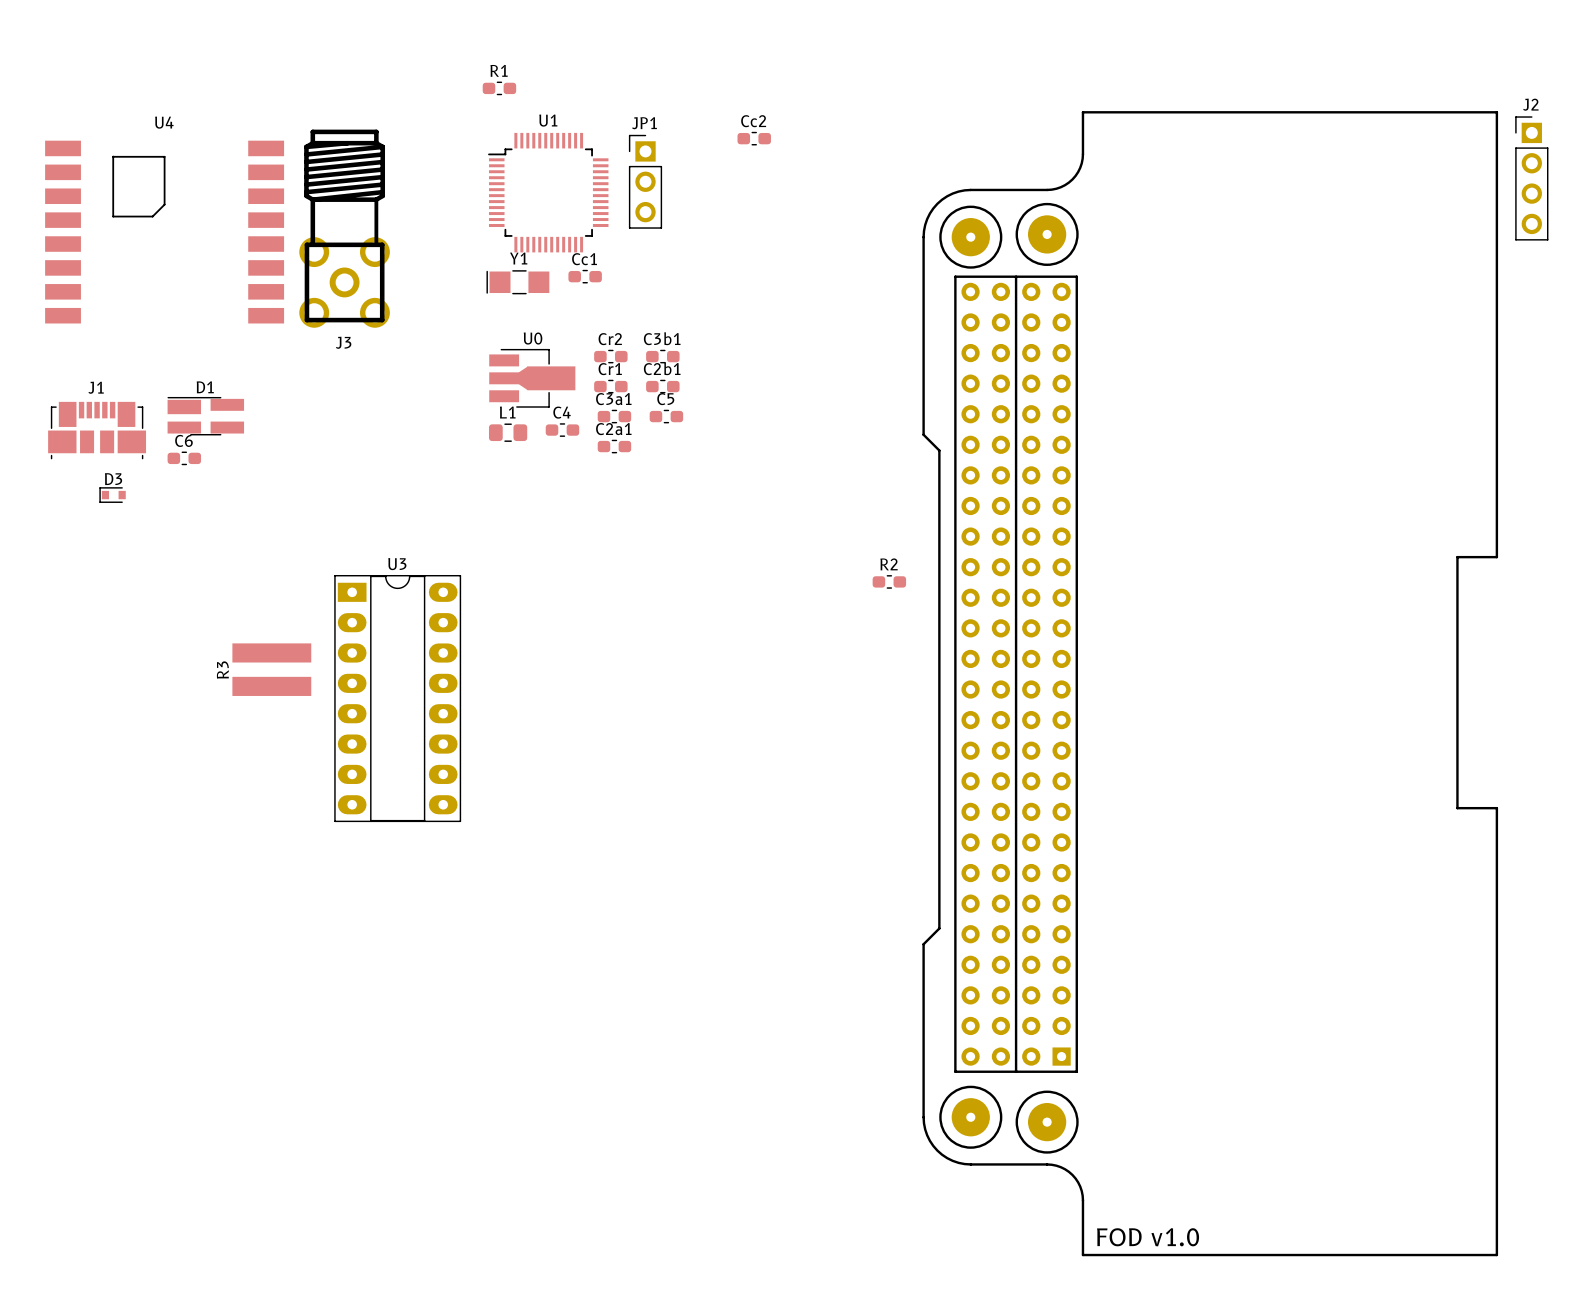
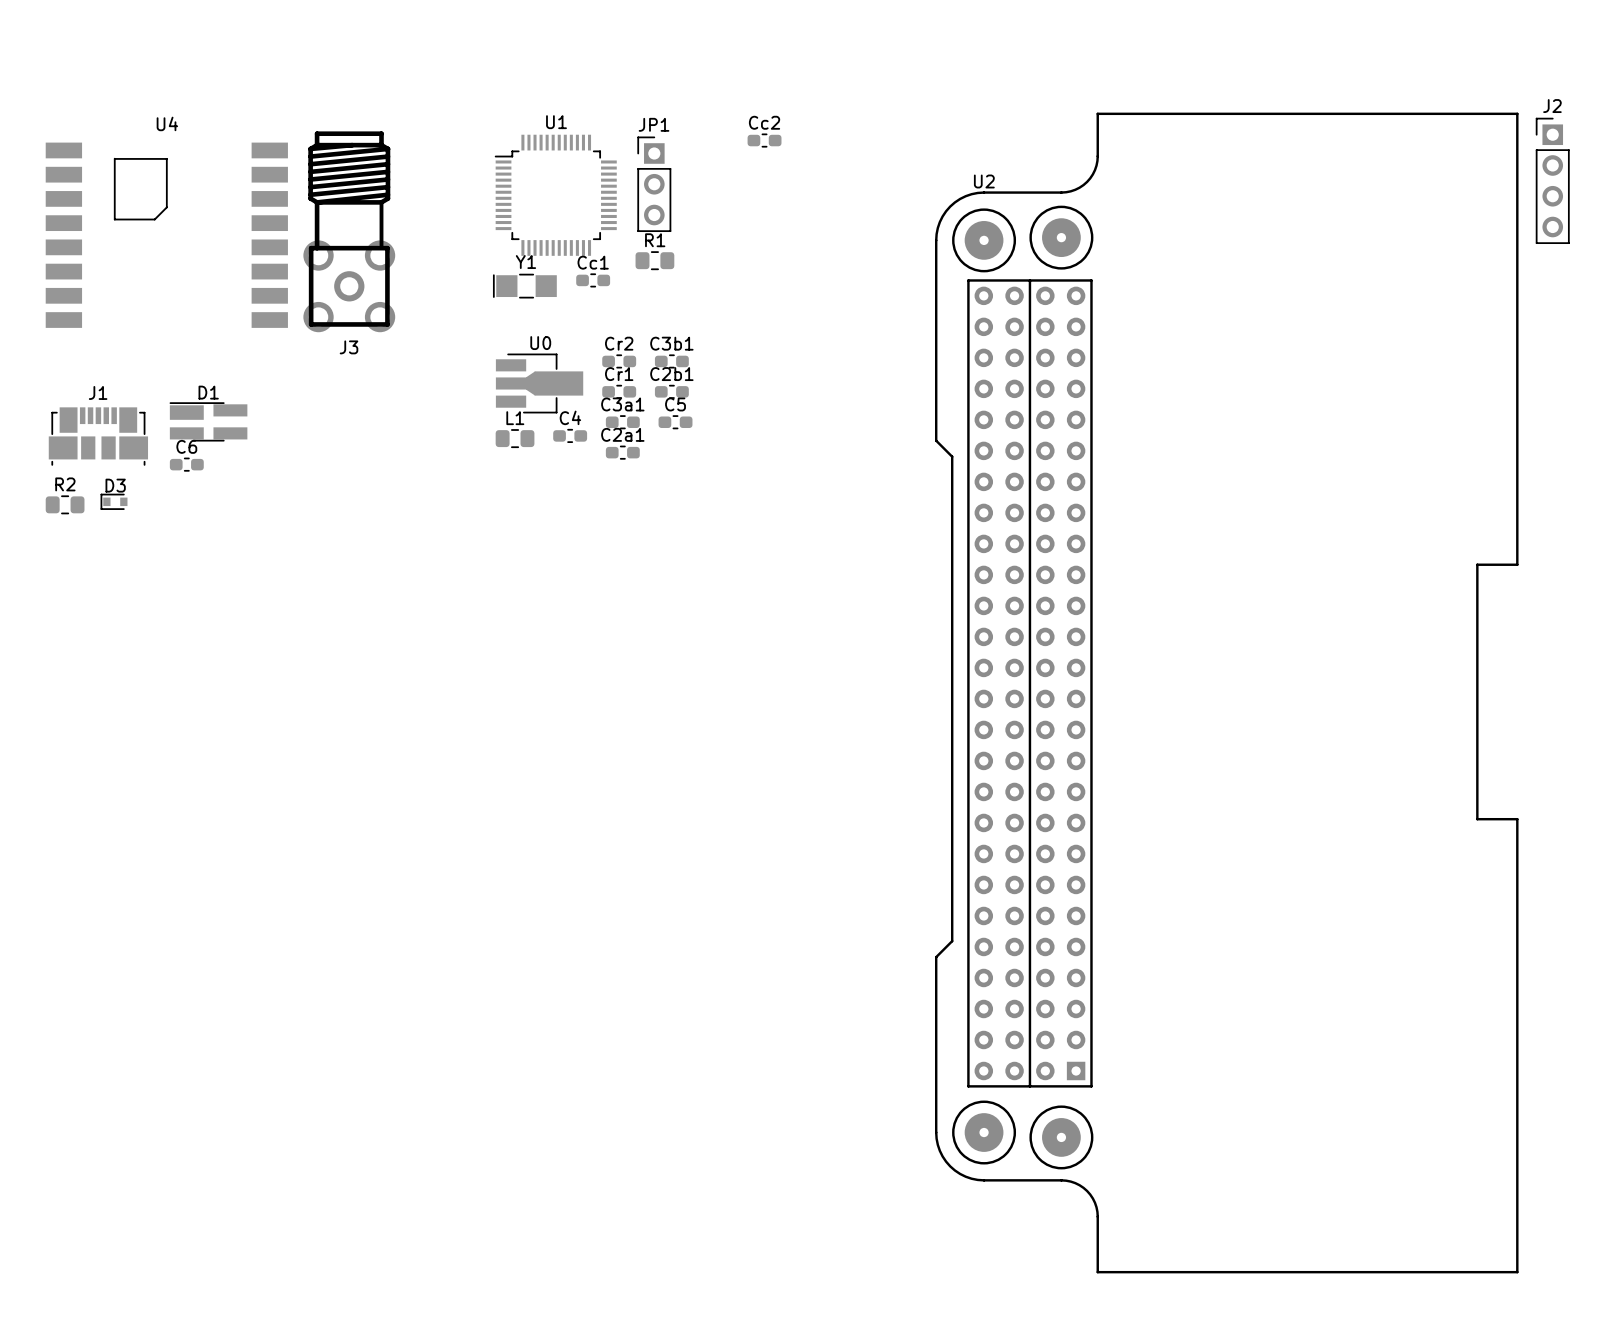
R1 footprint: [482, 81, 517, 96] -> [635, 251, 675, 271]
U2 name: none -> U2 (984, 181)
R2 footprint: [872, 575, 907, 589] -> [45, 495, 85, 515]
R3: (271, 669) -> none
U3: (397, 698) -> none
text: FOD v1.0 (1148, 1237) -> none

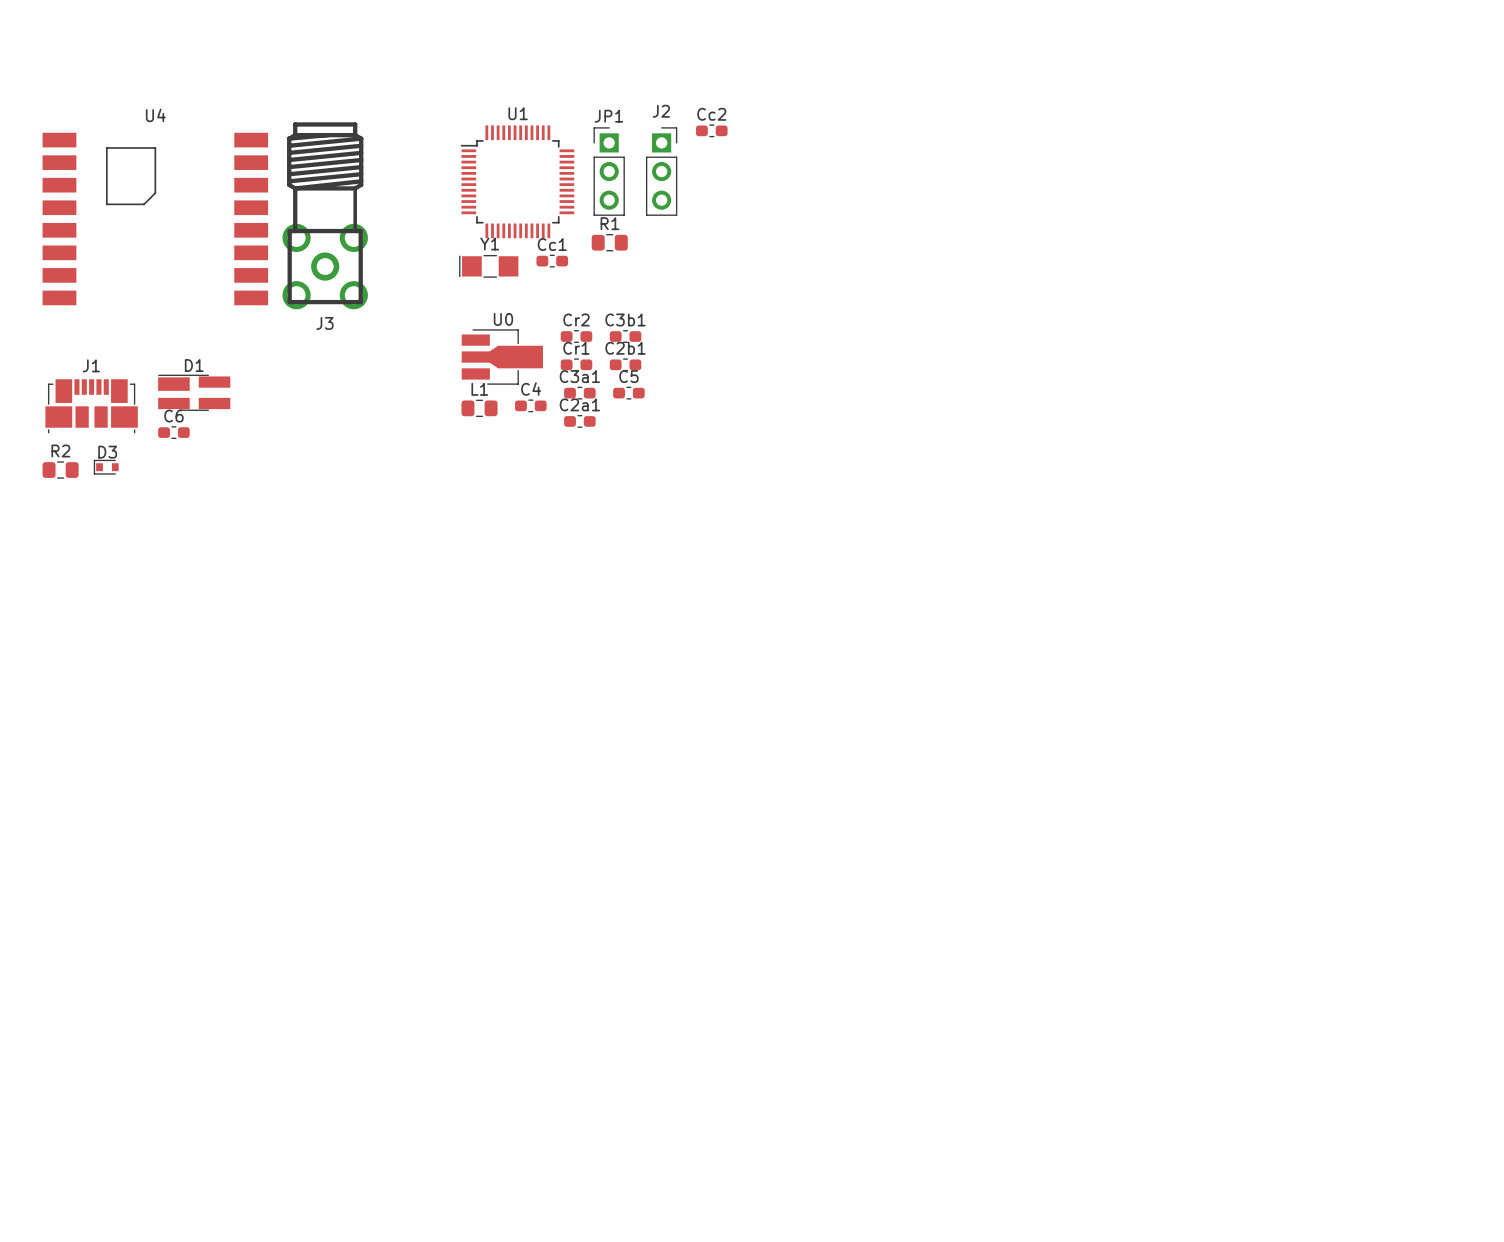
J2 footprint: [1535, 117, 1570, 244] -> [645, 127, 678, 216]
U2: (1226, 692) -> none

